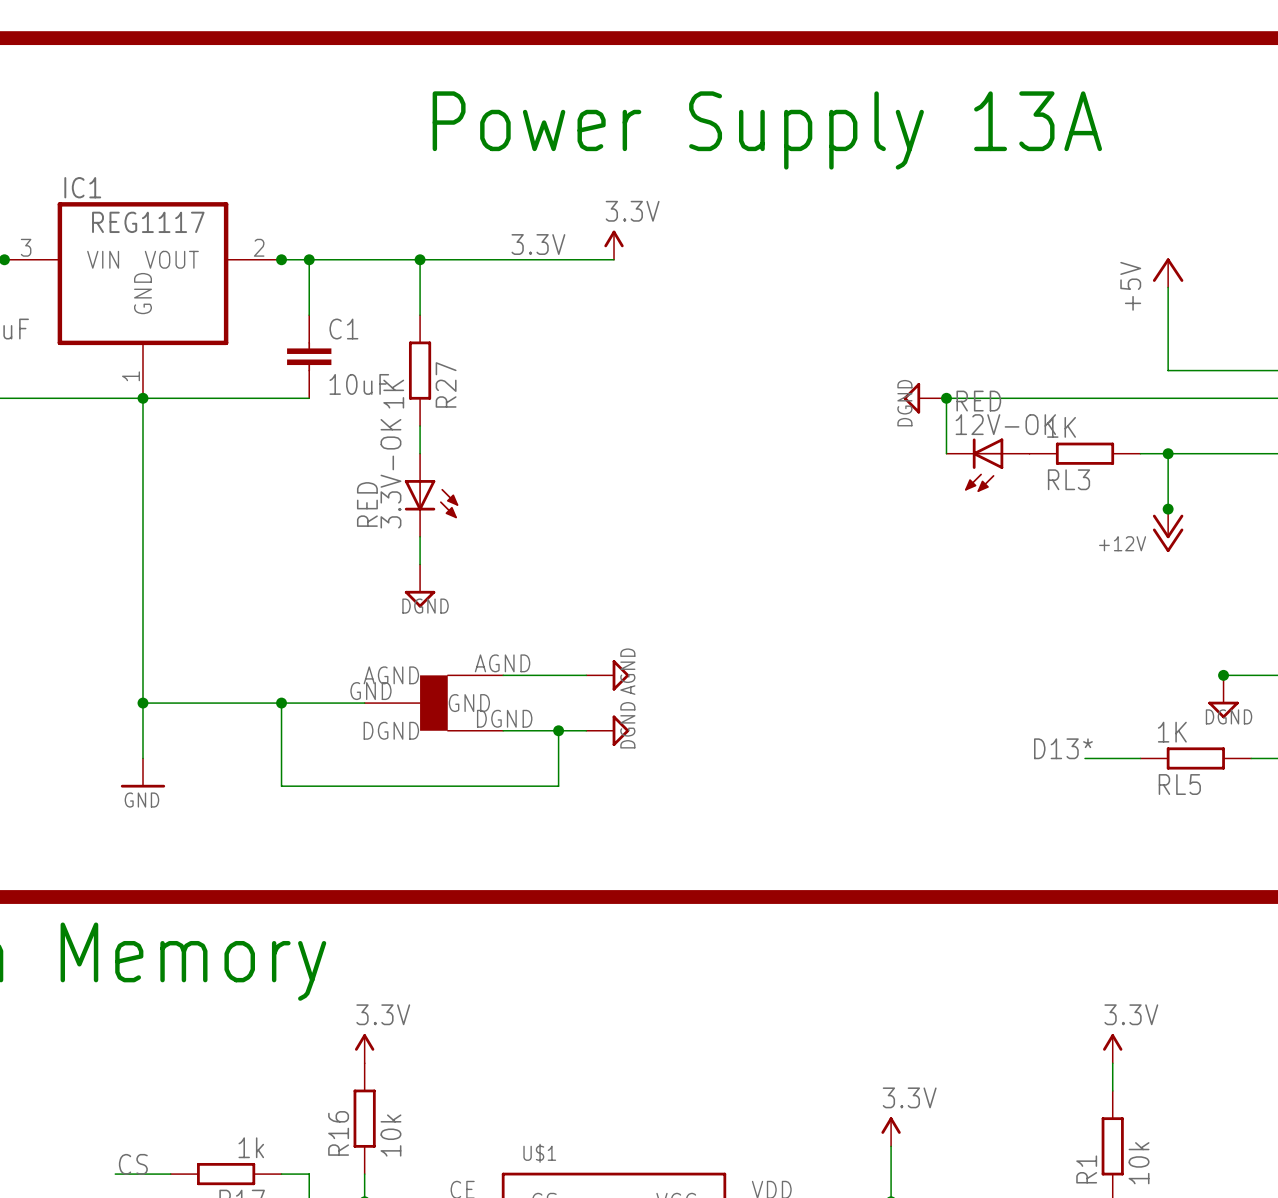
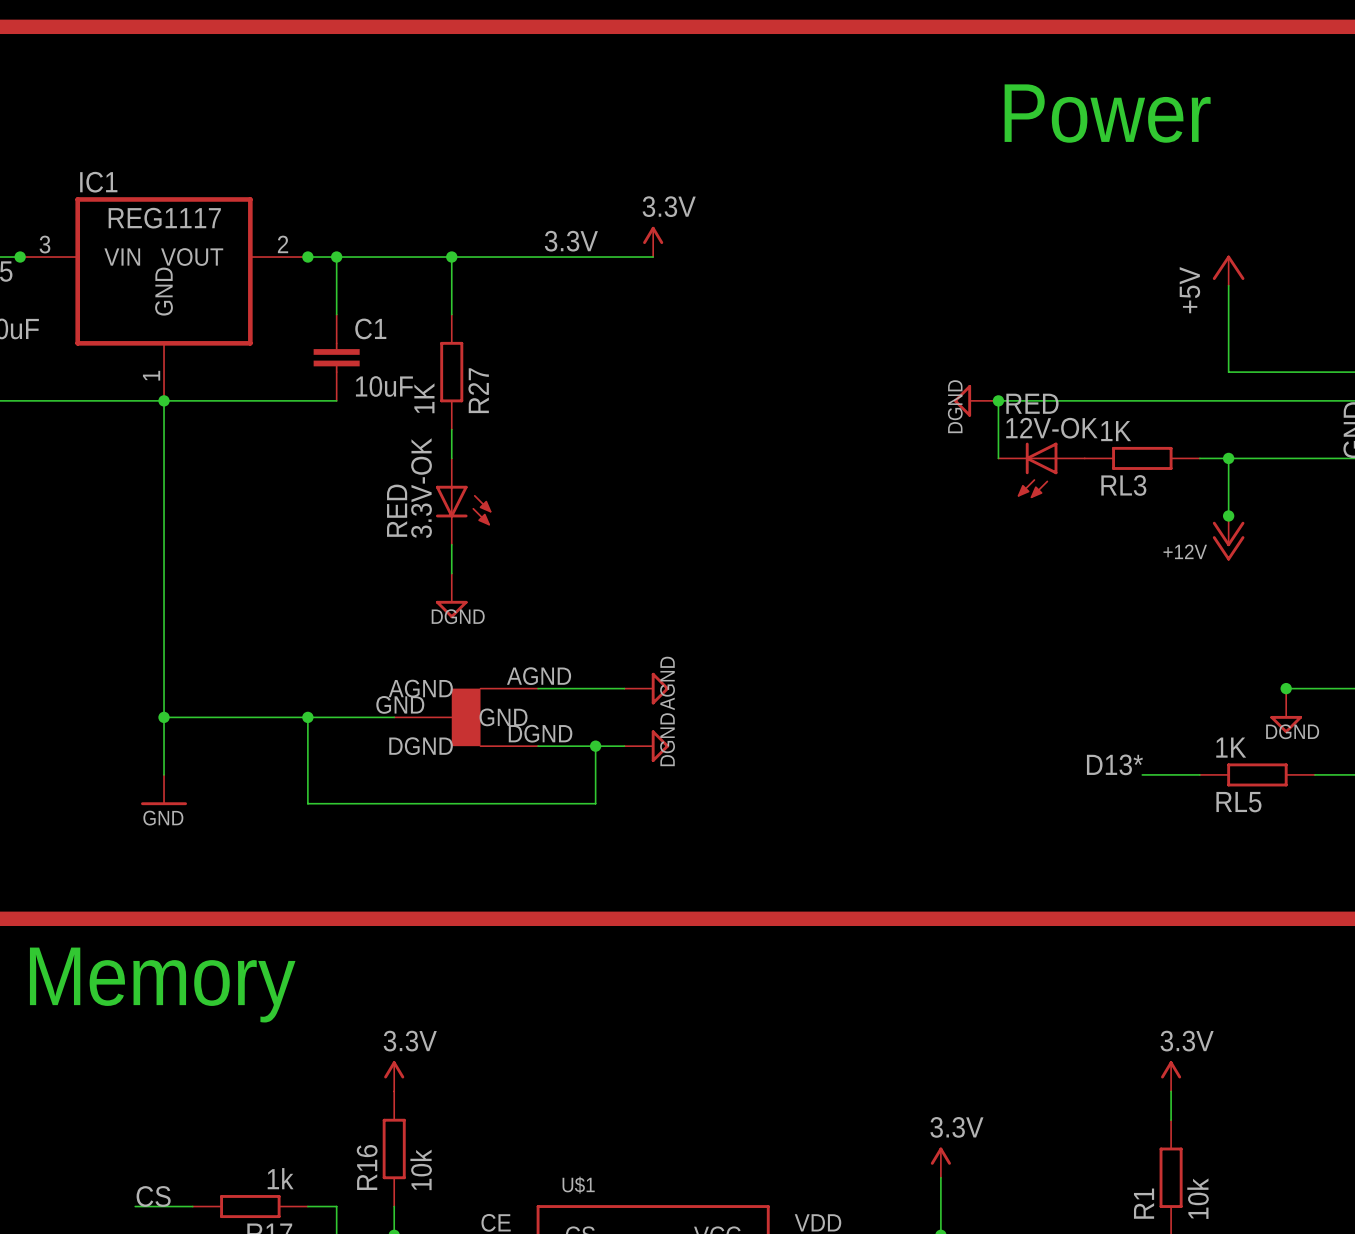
text: none -> Power (1107, 113)
text: Power Supply 13A (767, 130) -> none

